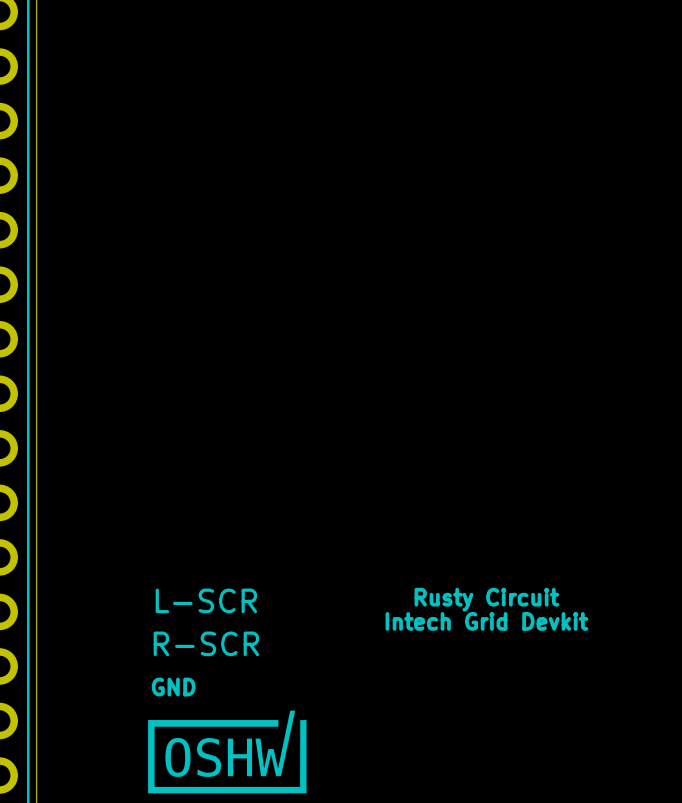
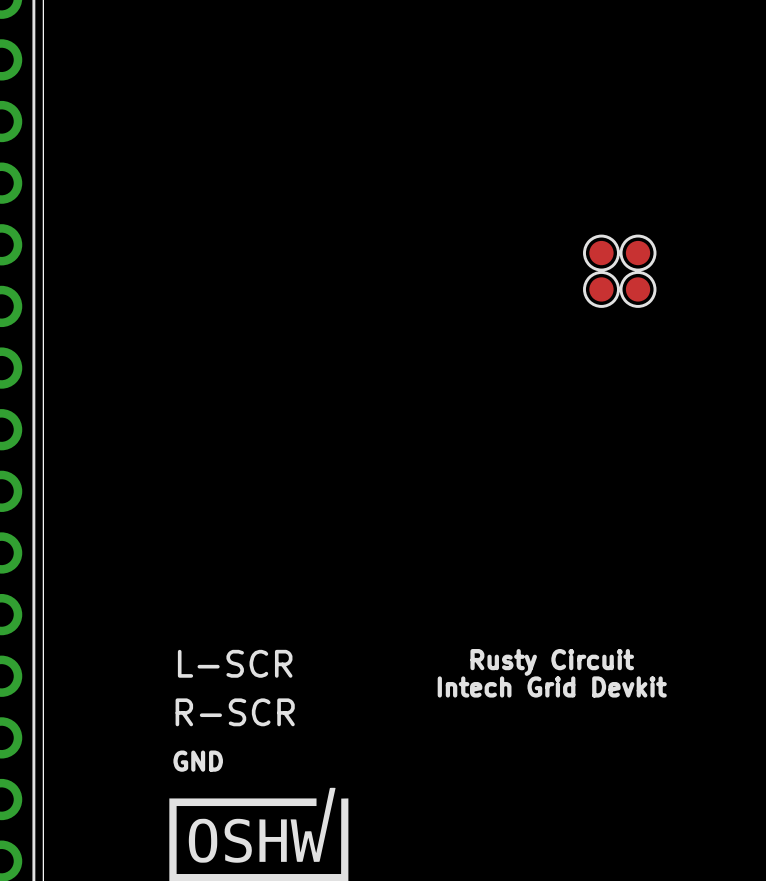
part: none -> (601, 253)
part: none -> (638, 253)
part: none -> (601, 289)
part: none -> (638, 289)

